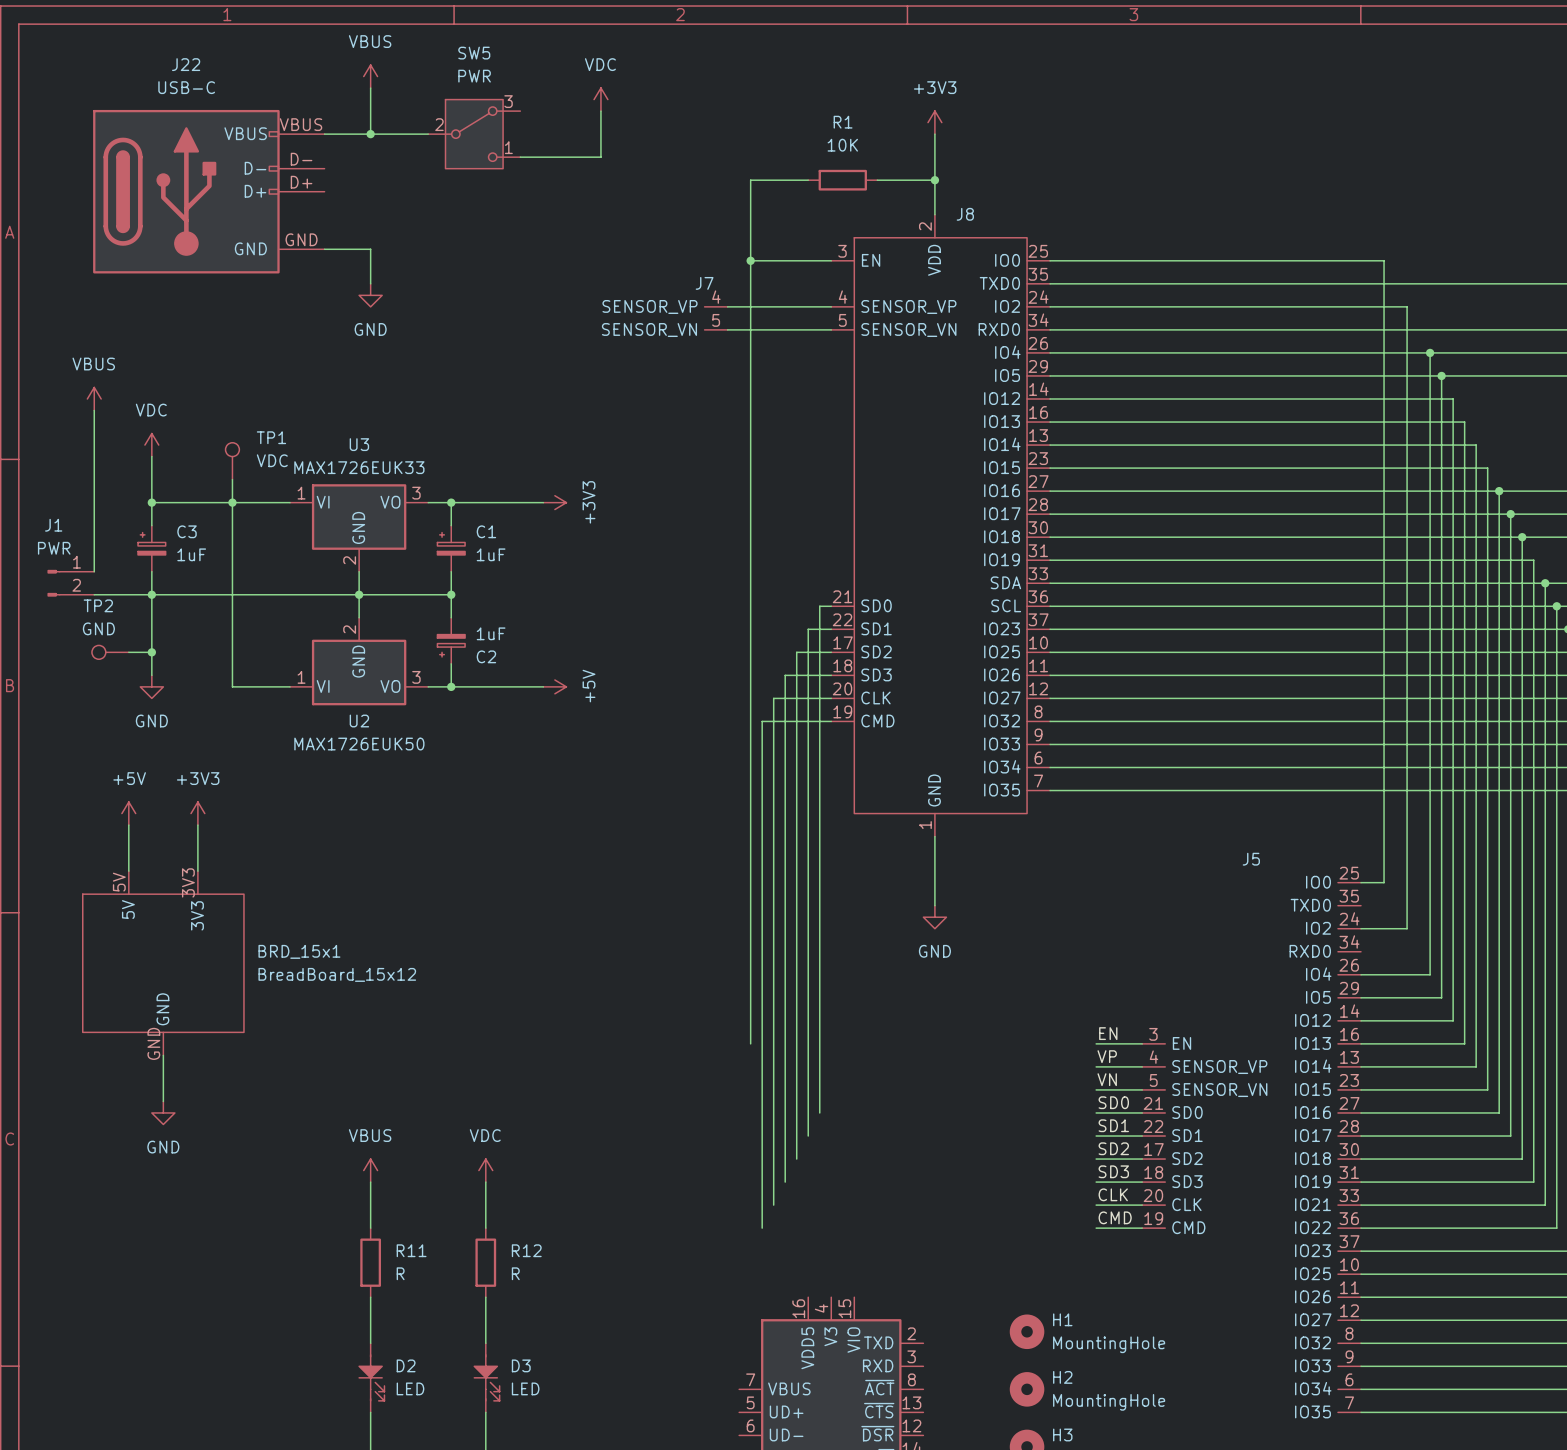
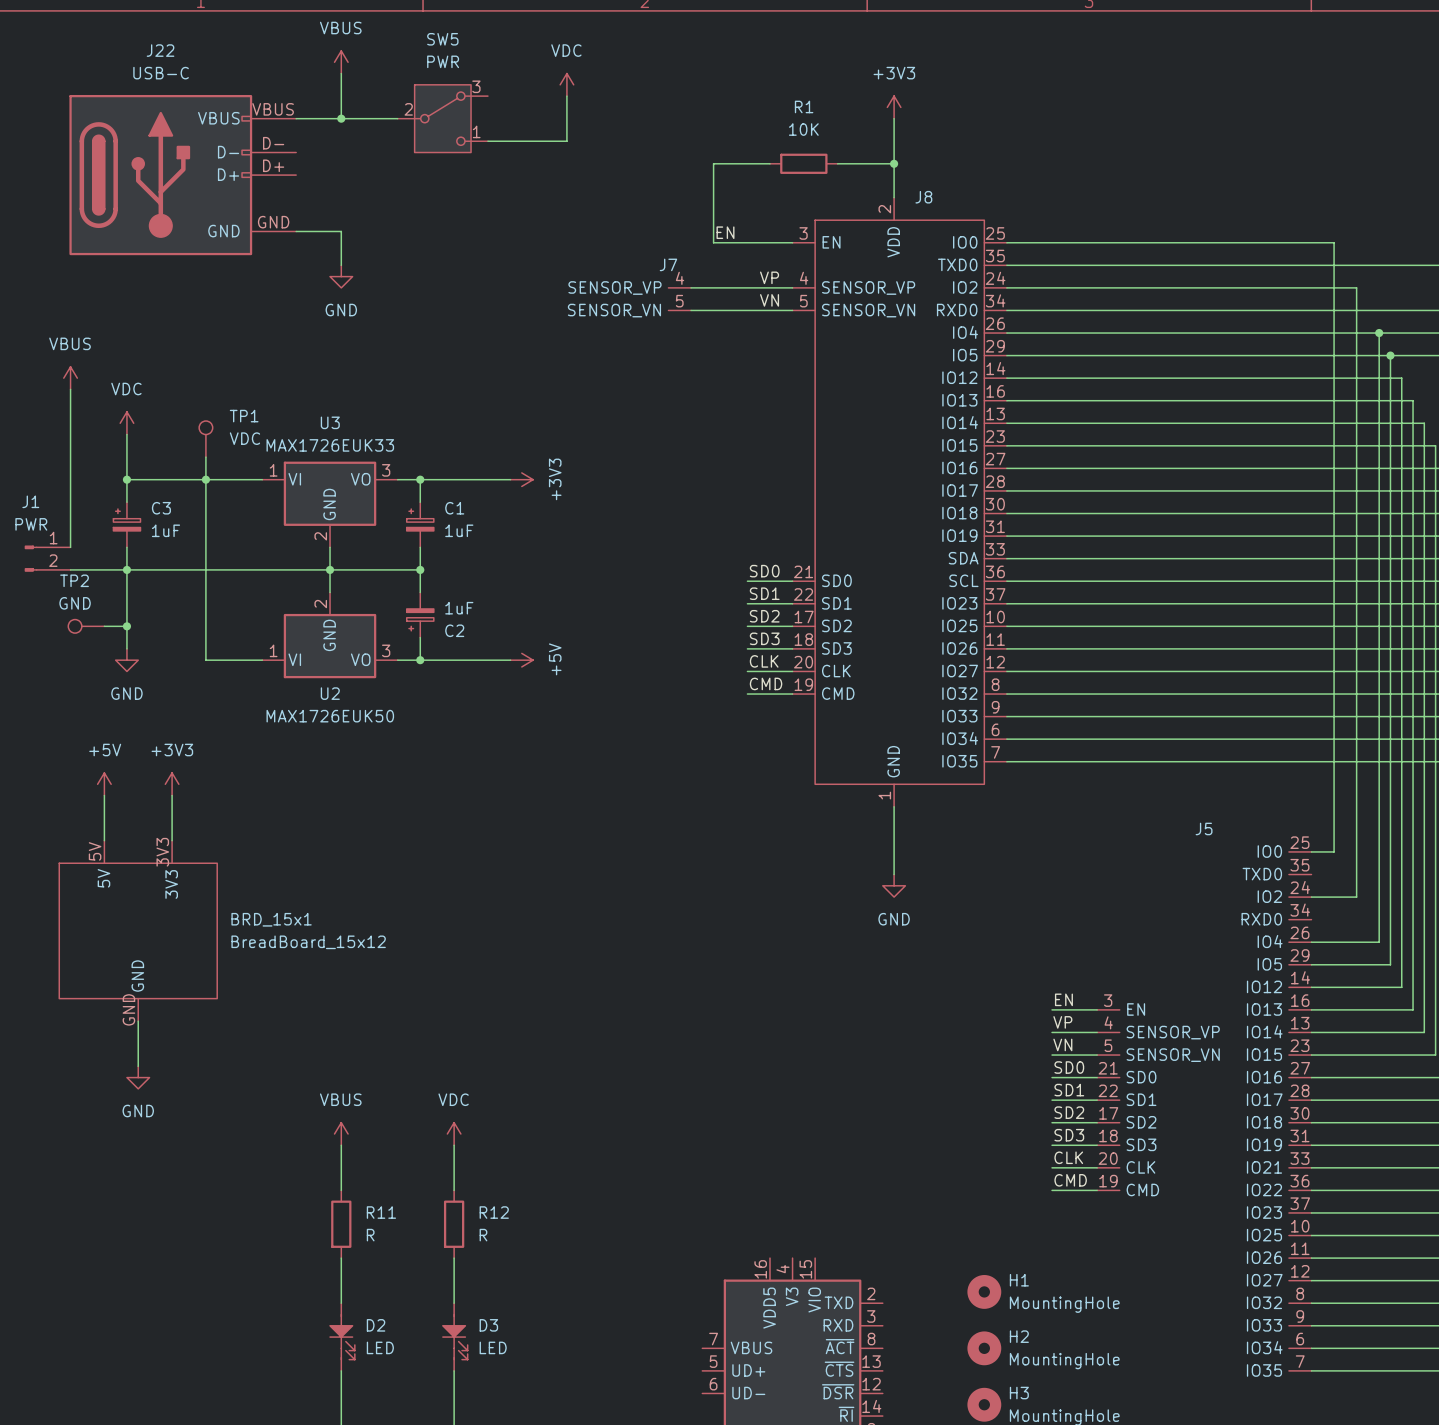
label: none -> EN (725, 232)
wire: (750, 260) (750, 1043) -> none
junction: (750, 260) -> none
label: none -> VP (769, 277)
label: none -> VN (769, 300)
label: none -> SD0 (764, 571)
wire: (819, 606) (819, 1112) -> (781, 581) (747, 581)
label: none -> SD1 (764, 593)
wire: (808, 629) (808, 1136) -> (769, 603) (747, 603)
label: none -> SD2 (764, 616)
wire: (796, 652) (796, 1159) -> (758, 626) (747, 626)
label: none -> SD3 (764, 638)
wire: (785, 675) (785, 1182) -> none
label: none -> CLK (764, 661)
wire: (785, 698) (773, 698) (773, 1205) -> none
label: none -> CMD (766, 683)
wire: (785, 721) (762, 721) (762, 1228) -> none

